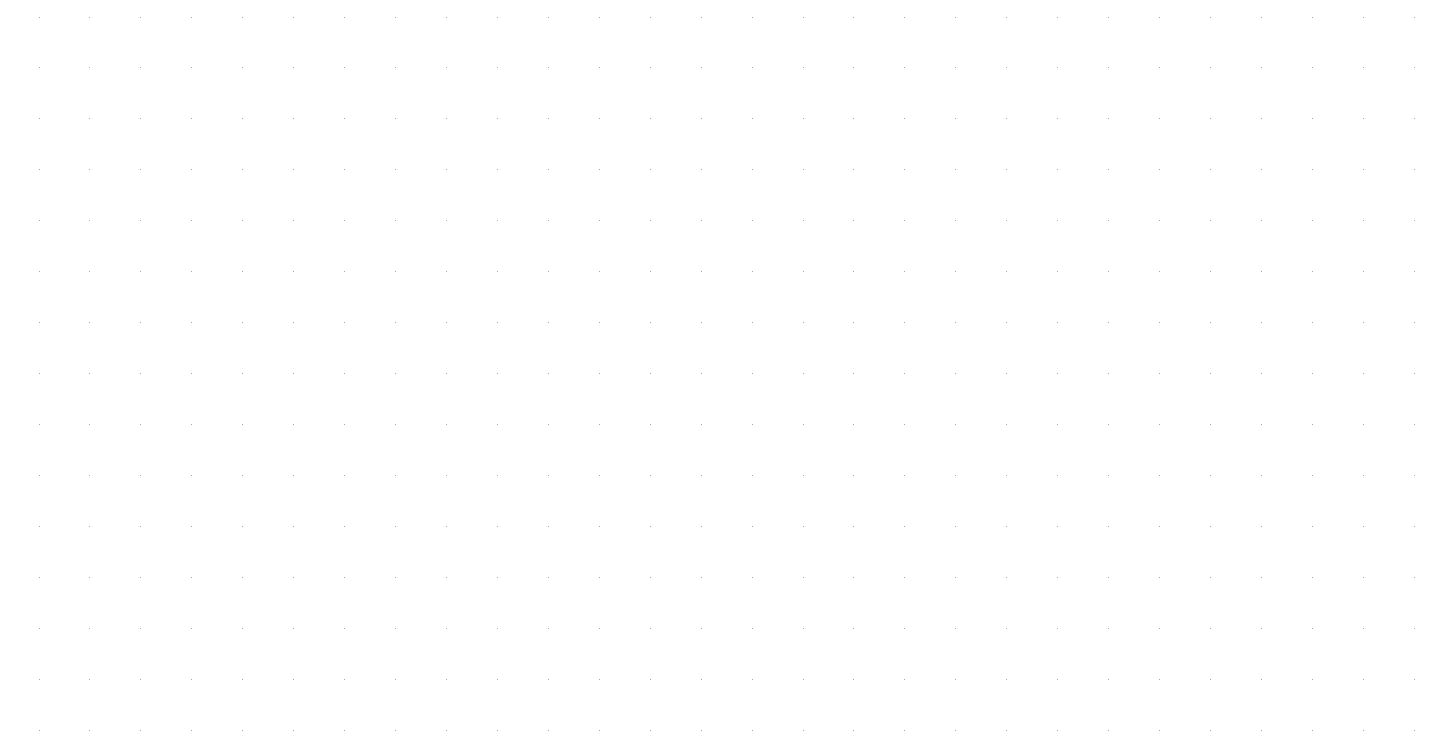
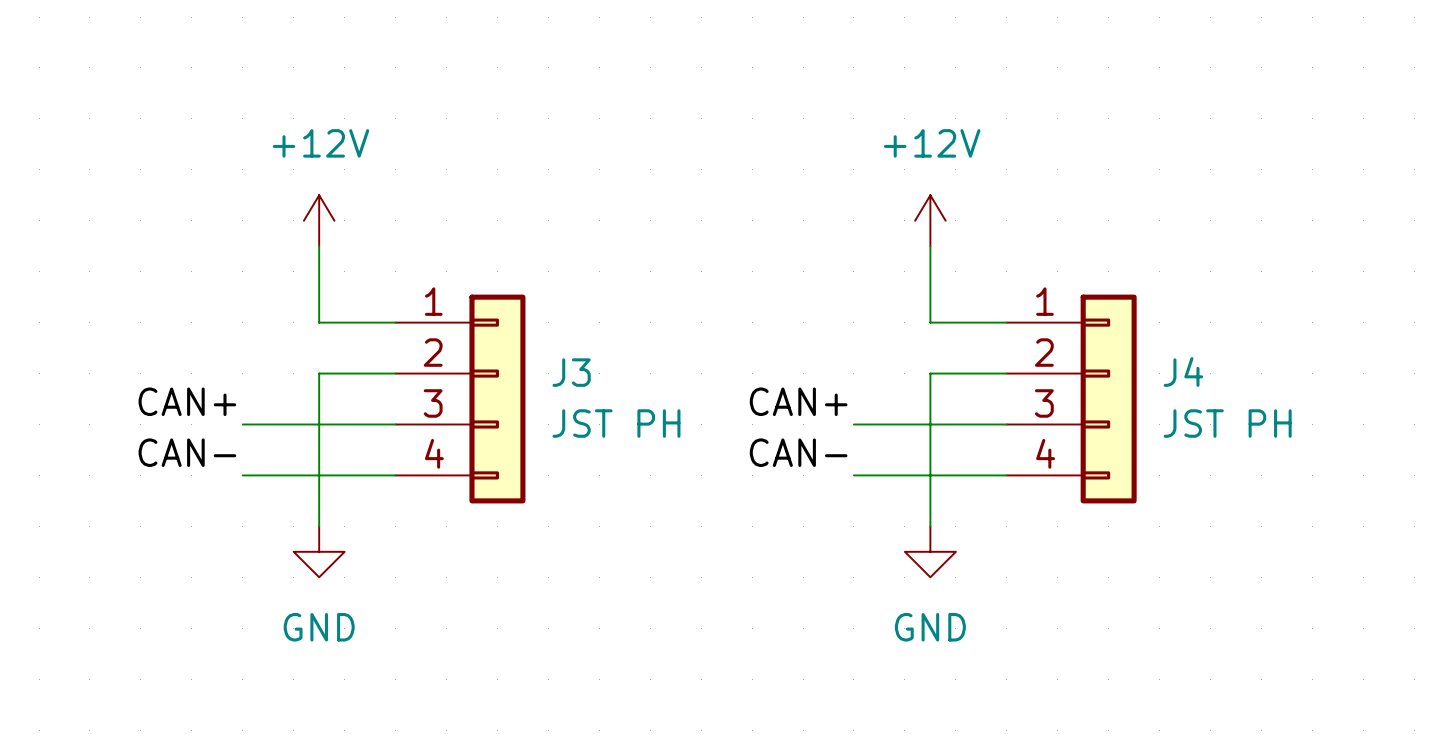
power symbol: none -> +12V (319, 220)
power symbol: none -> +12V (930, 220)
wire: none -> (319, 246) (319, 322) (395, 322)
wire: none -> (930, 246) (930, 322) (1006, 322)
wire: none -> (395, 373) (319, 373) (319, 526)
wire: none -> (1006, 373) (930, 373) (930, 526)
J3: none -> JST PH (460, 399)
J4: none -> JST PH (1071, 399)
label: none -> CAN+ (187, 401)
label: none -> CAN+ (798, 401)
wire: none -> (242, 424) (395, 424)
wire: none -> (853, 424) (1006, 424)
label: none -> CAN- (187, 452)
label: none -> CAN- (798, 452)
wire: none -> (242, 475) (395, 475)
wire: none -> (853, 475) (1006, 475)
power symbol: none -> GND (319, 551)
power symbol: none -> GND (930, 551)

